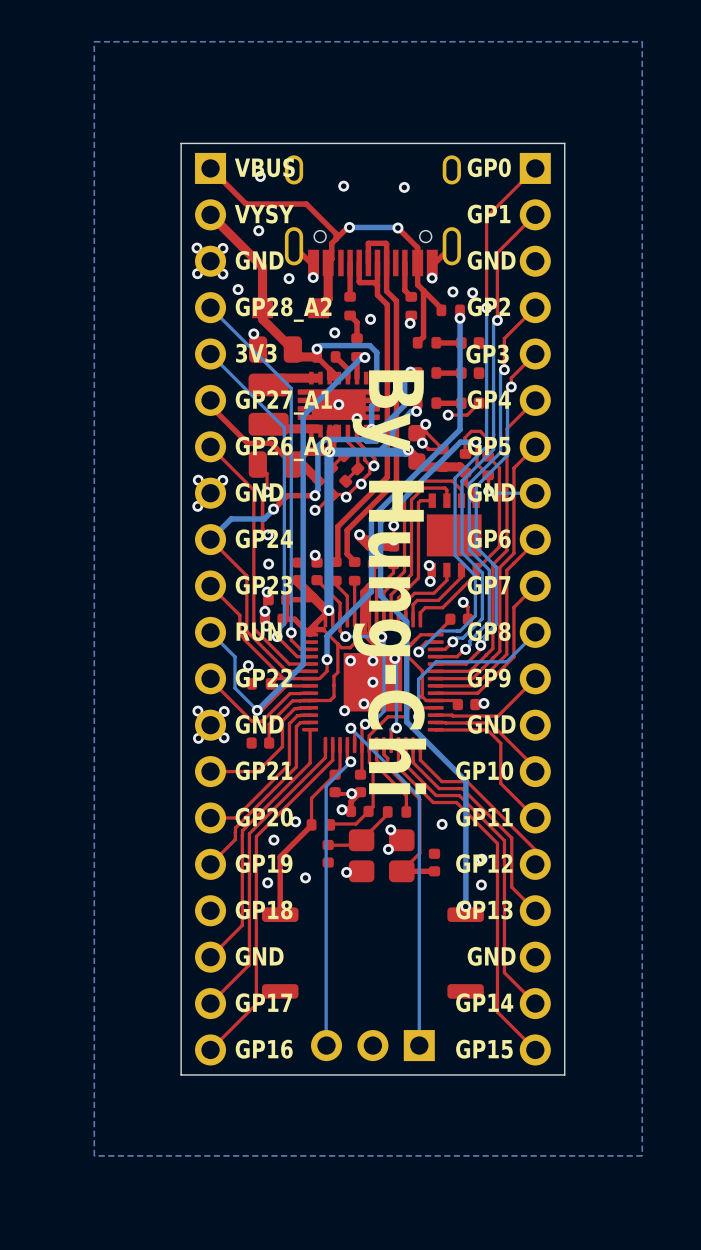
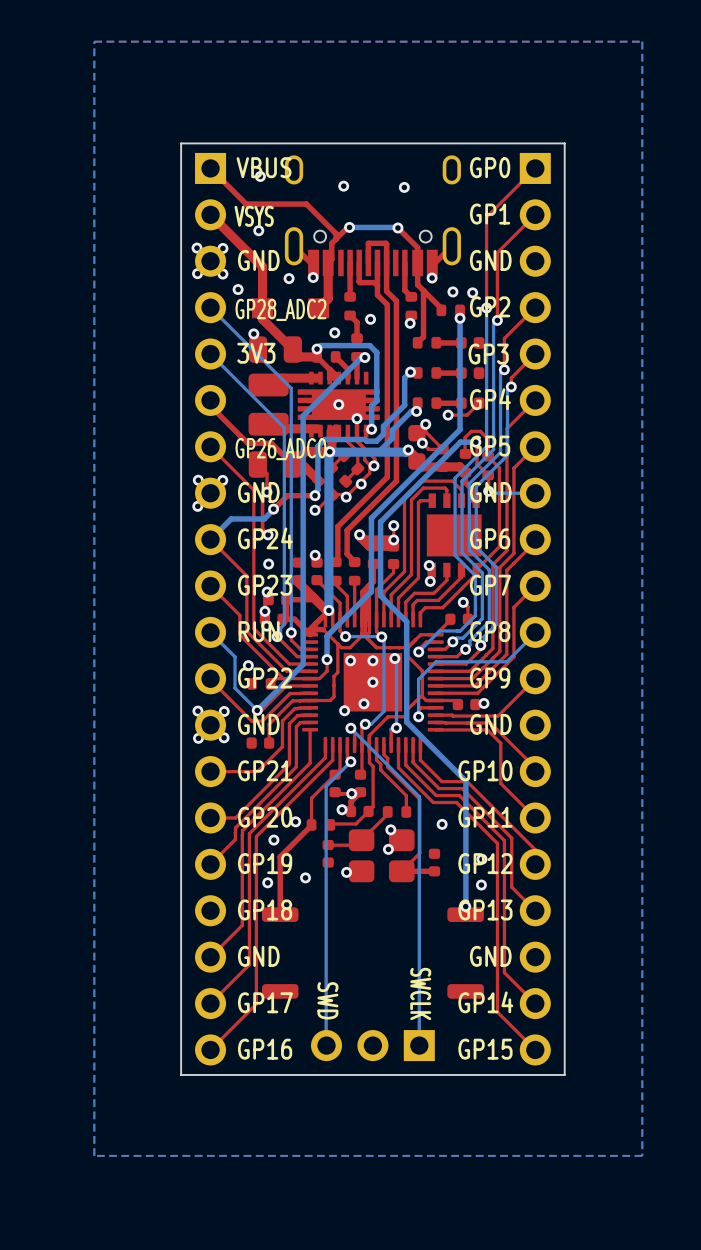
text: VYSY (264, 214) -> VSYS (254, 216)
text: GP28_A2 (283, 309) -> GP28_ADC2 (280, 309)
text: GP27_A1 (283, 402) -> none
text: GP26_A0 (284, 448) -> GP26_ADC0 (280, 449)
text: By Hung-Chi (389, 582) -> none
text: none -> SWCLK (420, 993)
text: none -> SWD (327, 1000)

